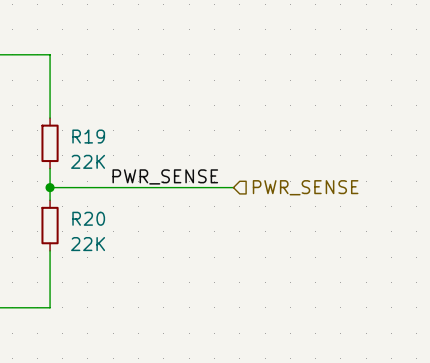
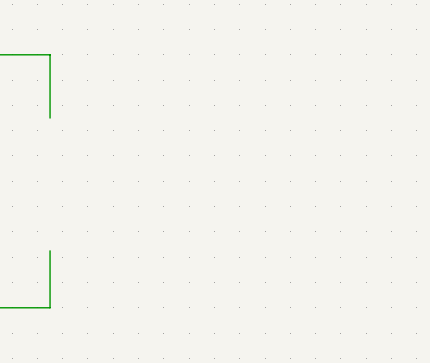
R19: 22K (50, 143) -> none
wire: (50, 168) (50, 200) -> none
label: PWR_SENSE (165, 176) -> none
wire: (50, 187) (233, 187) -> none
junction: (50, 187) -> none
hierarchical label: PWR_SENSE (305, 187) -> none
R20: 22K (50, 225) -> none

